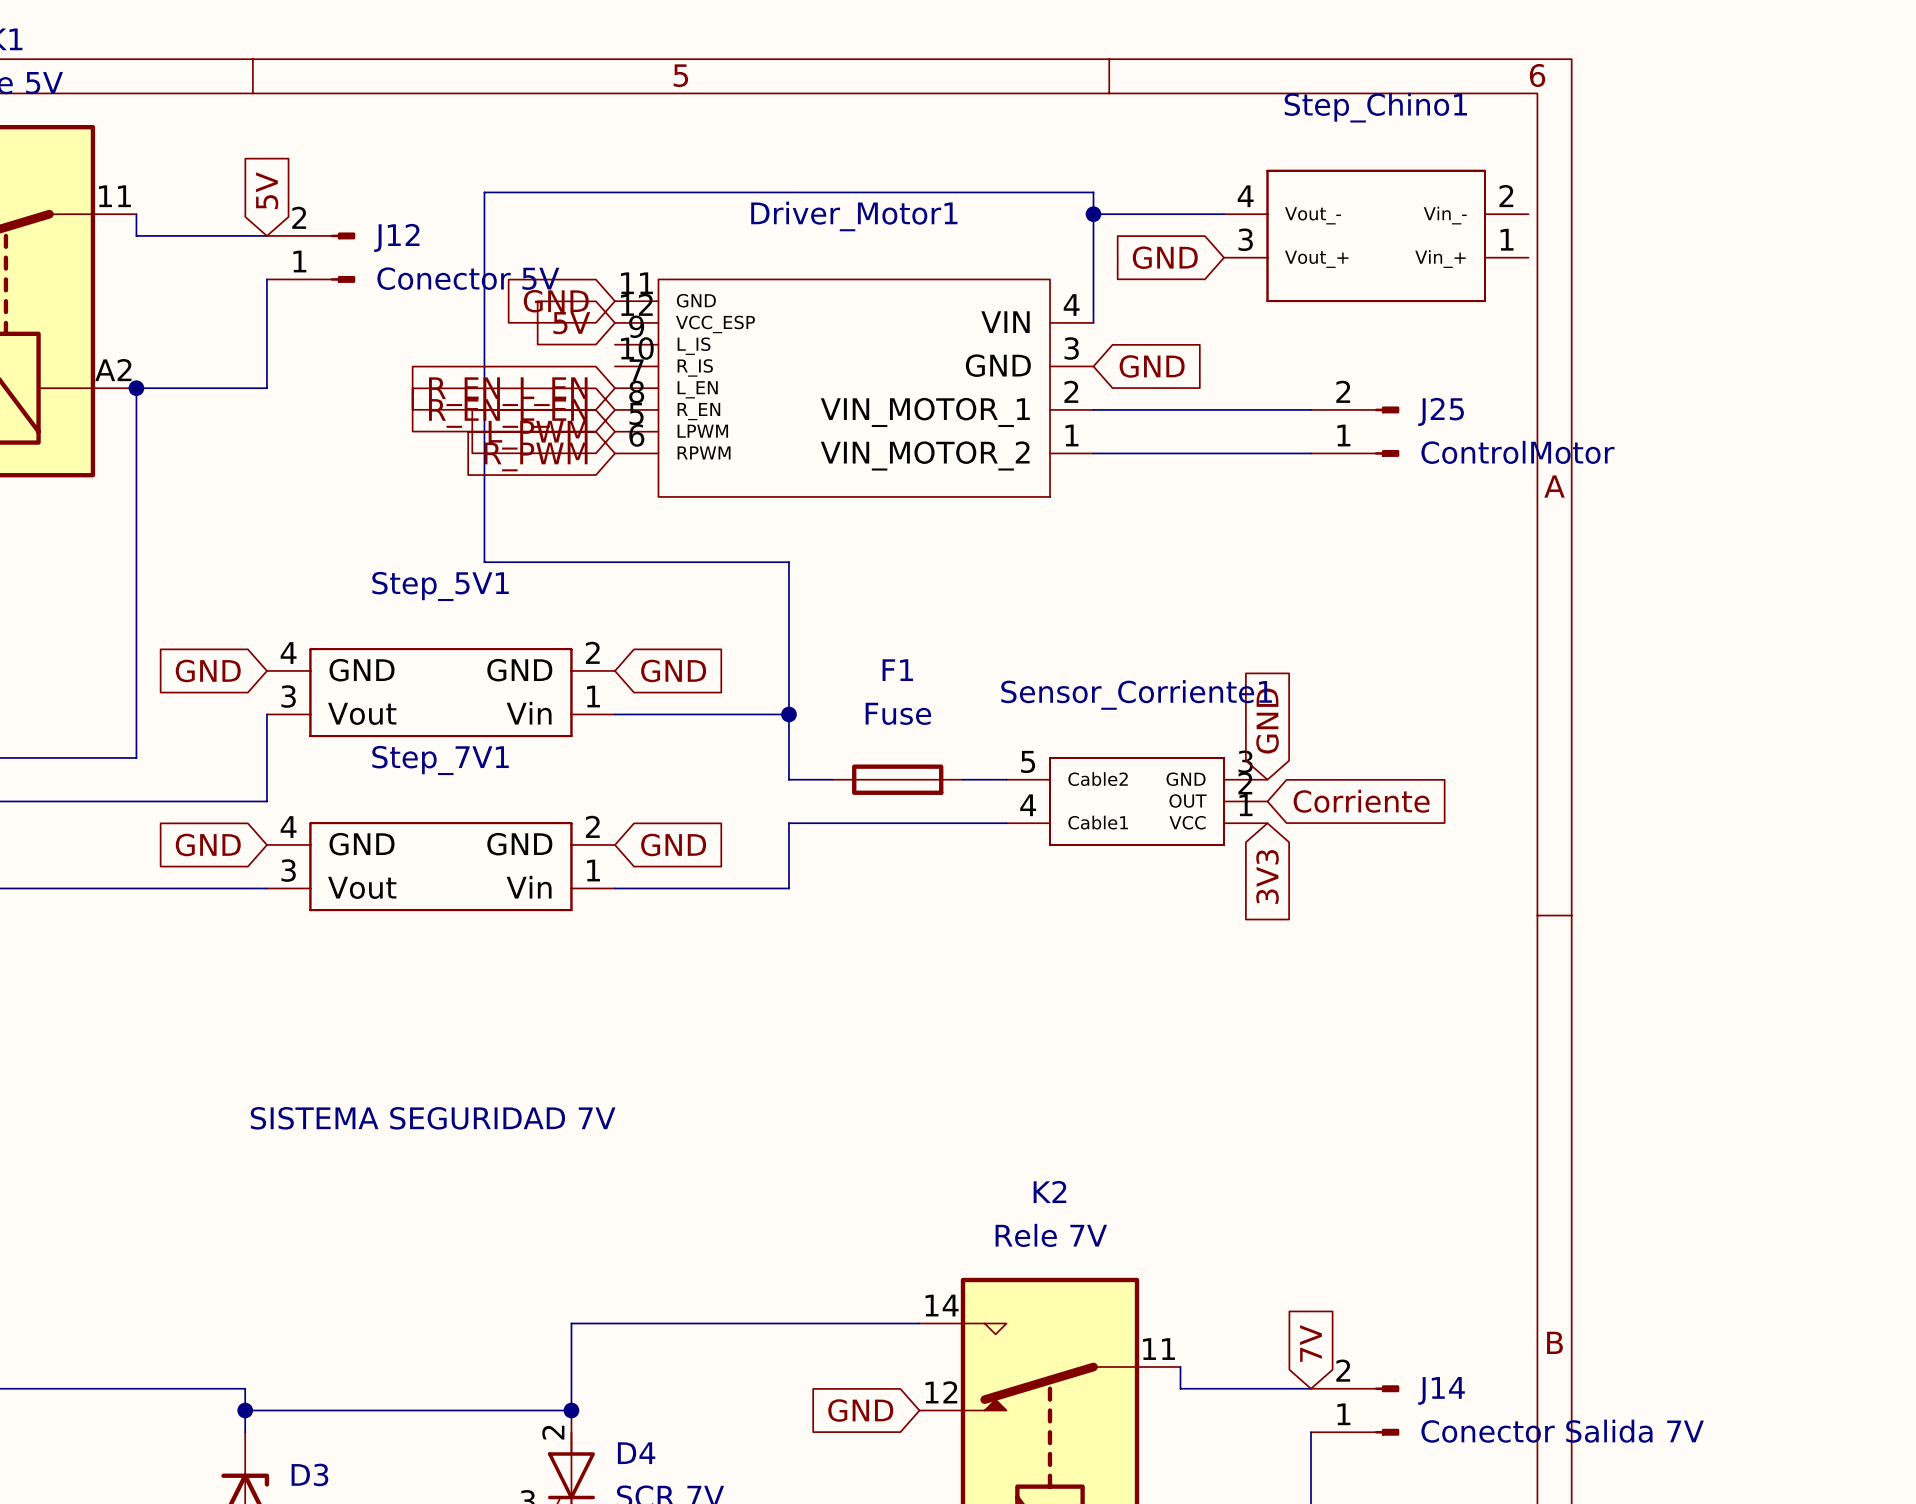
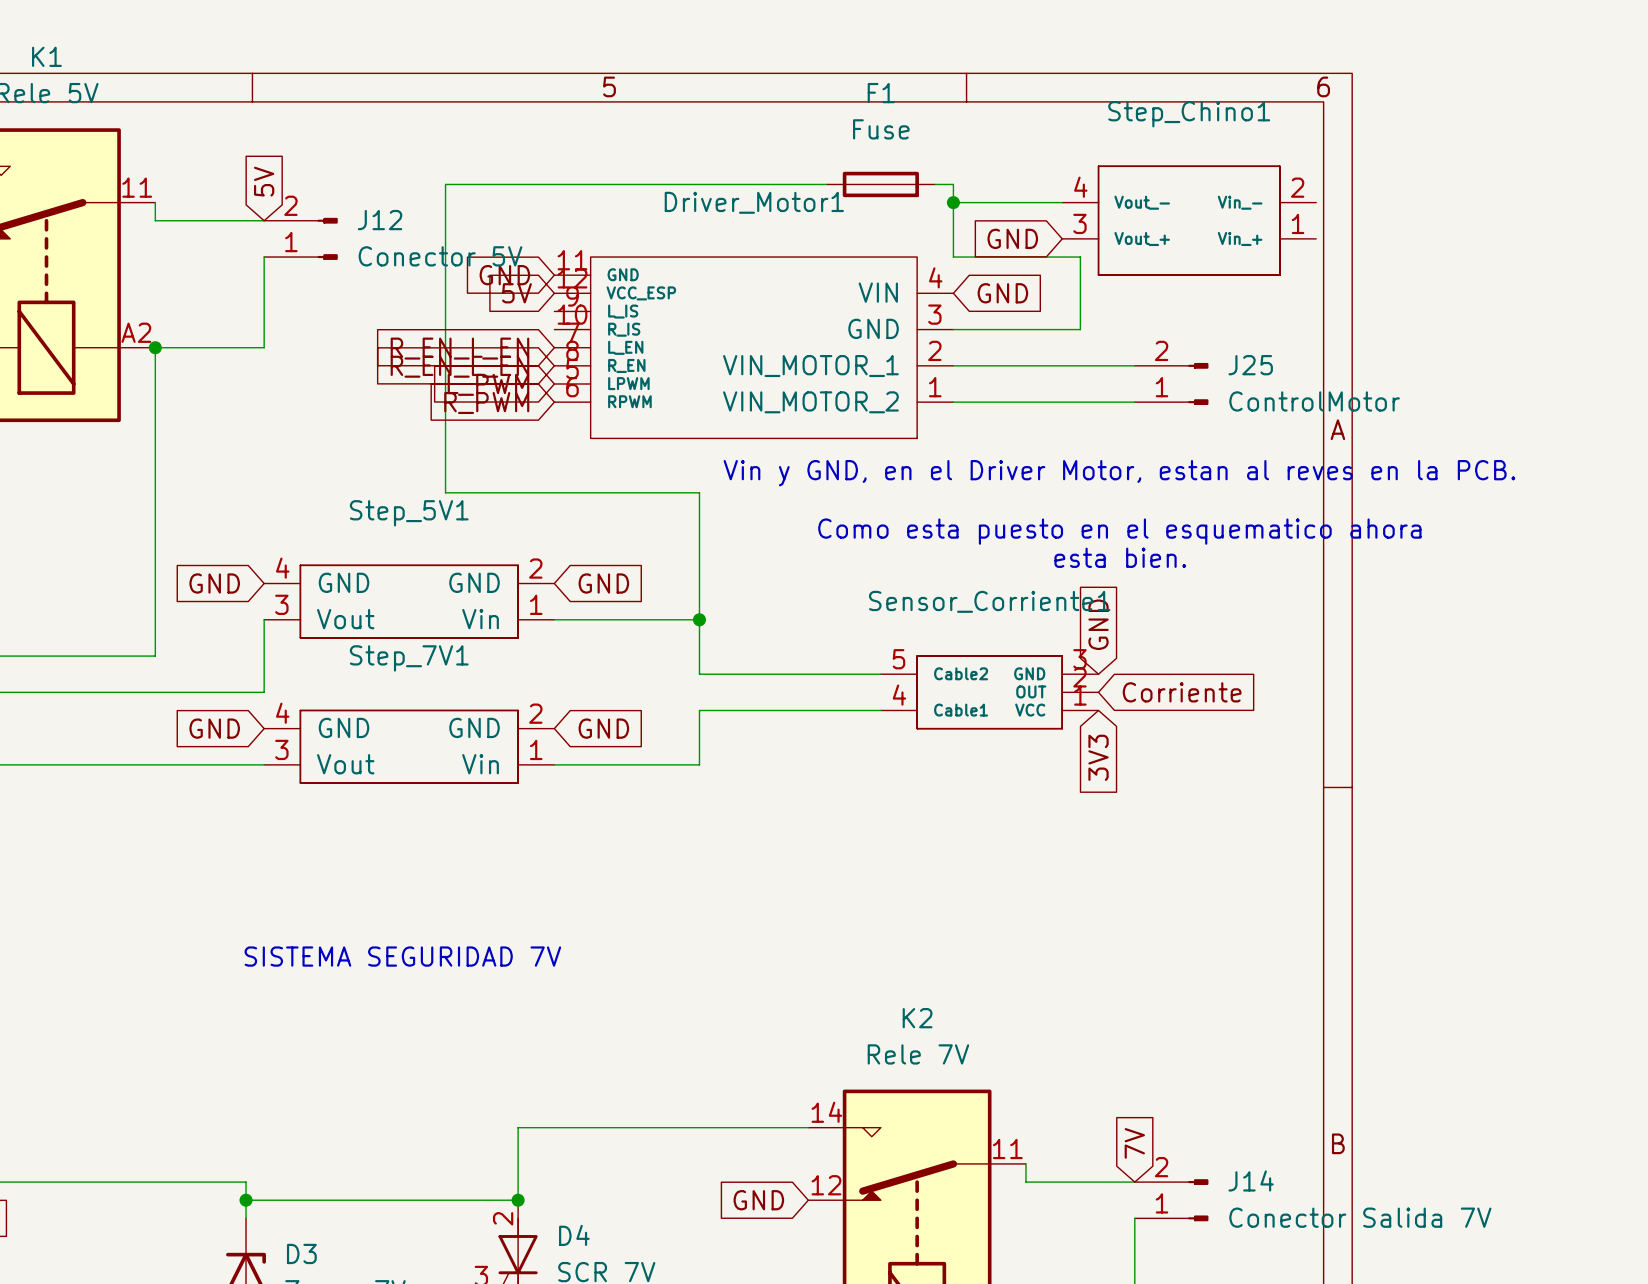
wire: (1093, 279) (1093, 322) -> (953, 257) (1080, 257) (1080, 329) (953, 329)
global label position: GND (1152, 366) -> GND (1002, 293)
text: none -> Vin y GND, en el Driver Motor, estan al reves en la PCB. (1119, 473)
text: none -> Como esta puesto en el esquematico ahora (1119, 531)
text: none -> esta bien. (1120, 557)
F1 position: (897, 779) -> (880, 184)

